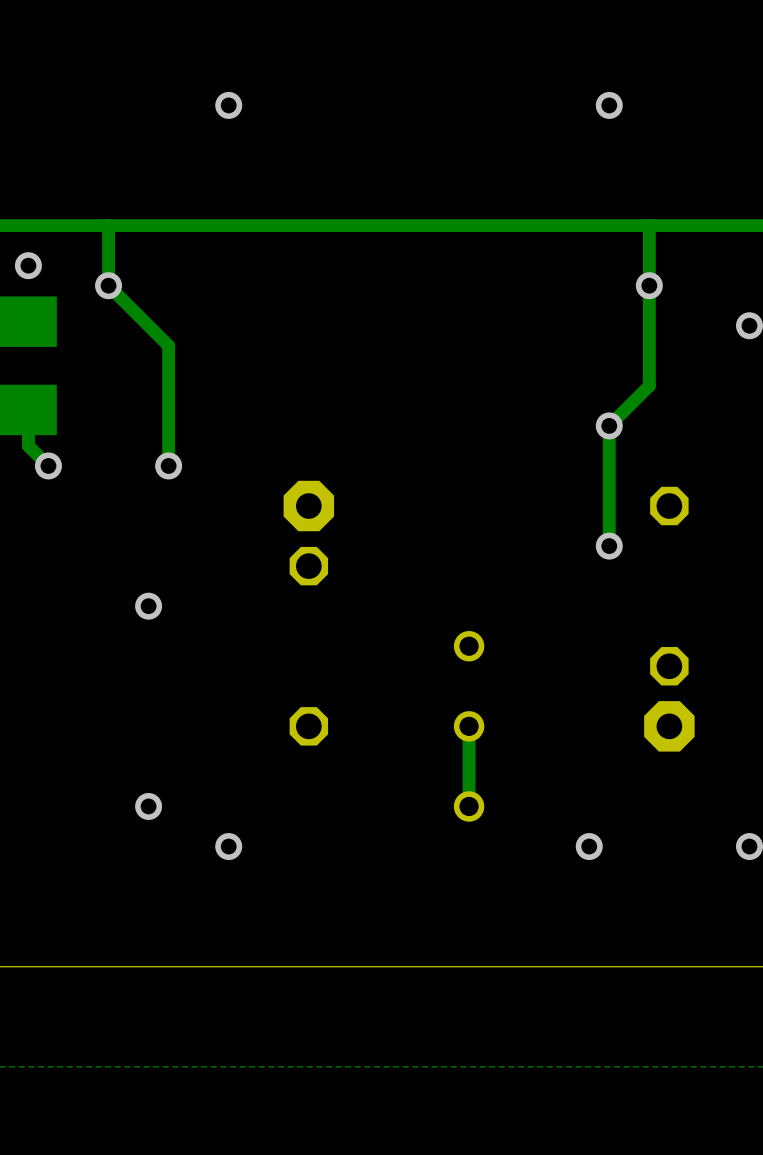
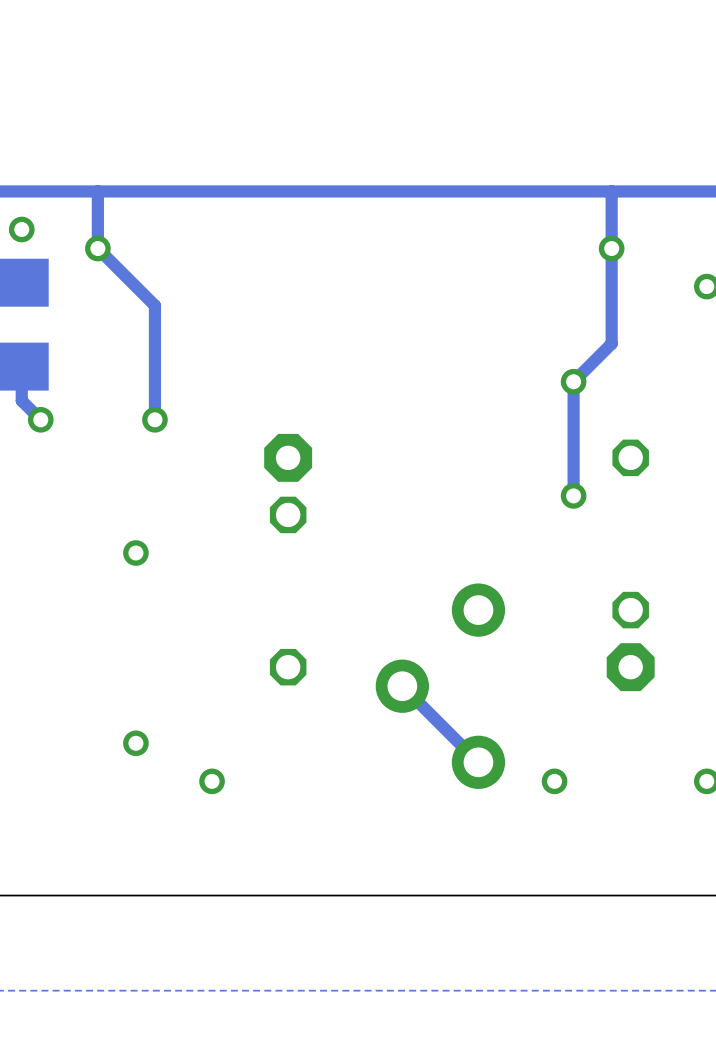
via: (228, 105) -> none
via: (609, 105) -> none
part footprint: [453, 631, 485, 822] -> [375, 583, 506, 789]
track: (469, 726) (469, 806) -> none
track: none -> (402, 686) (478, 762)

